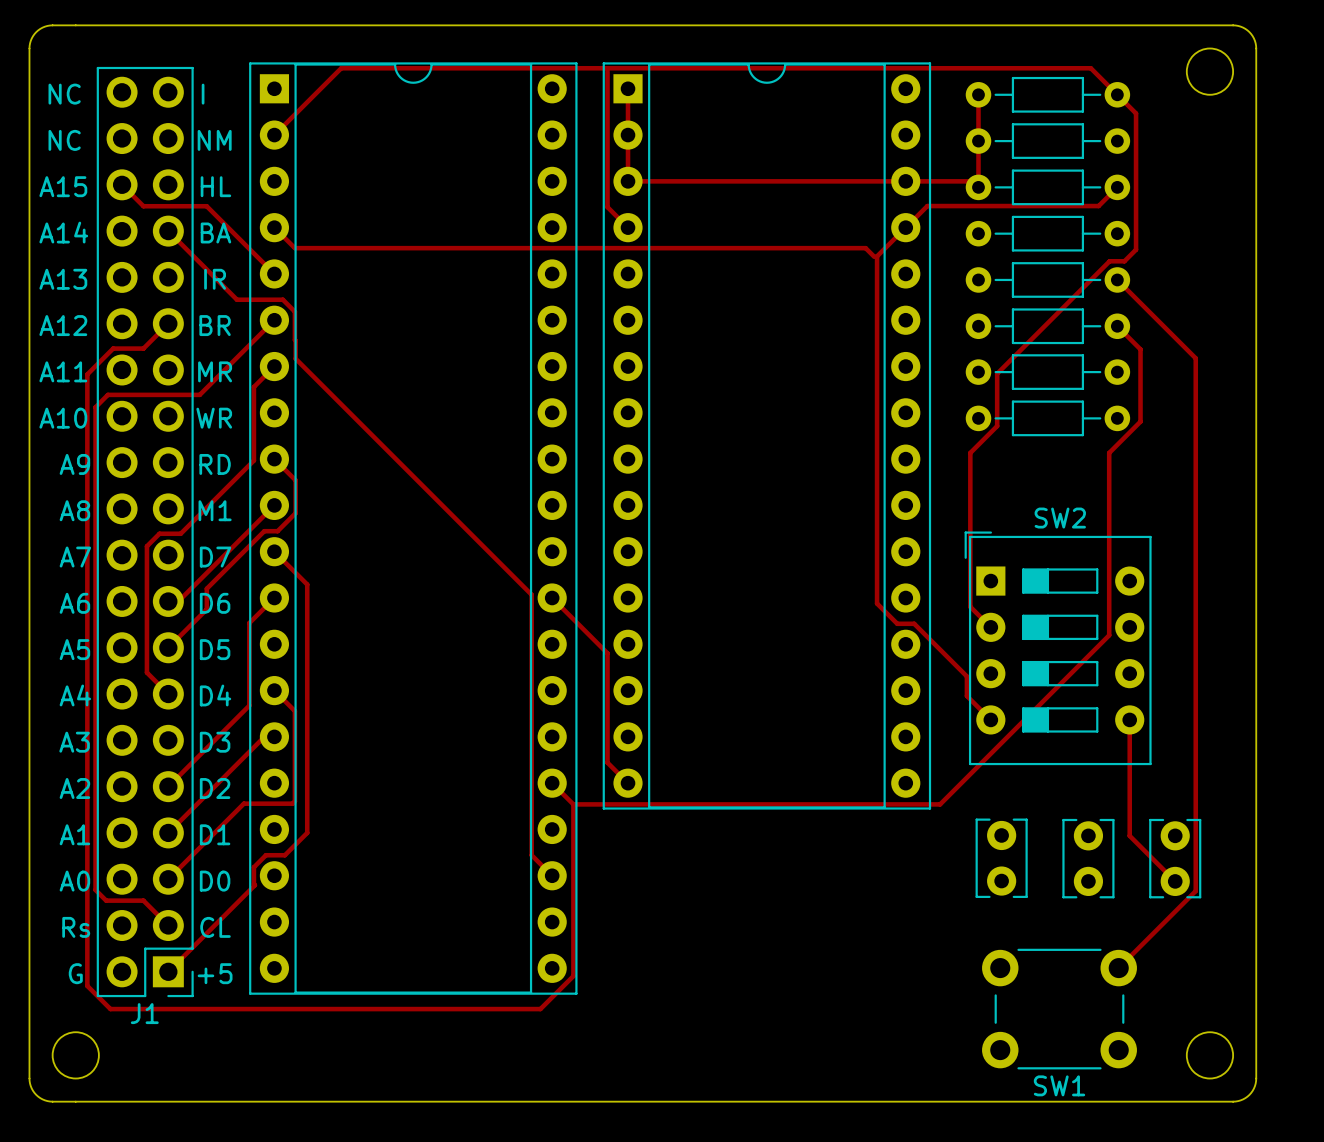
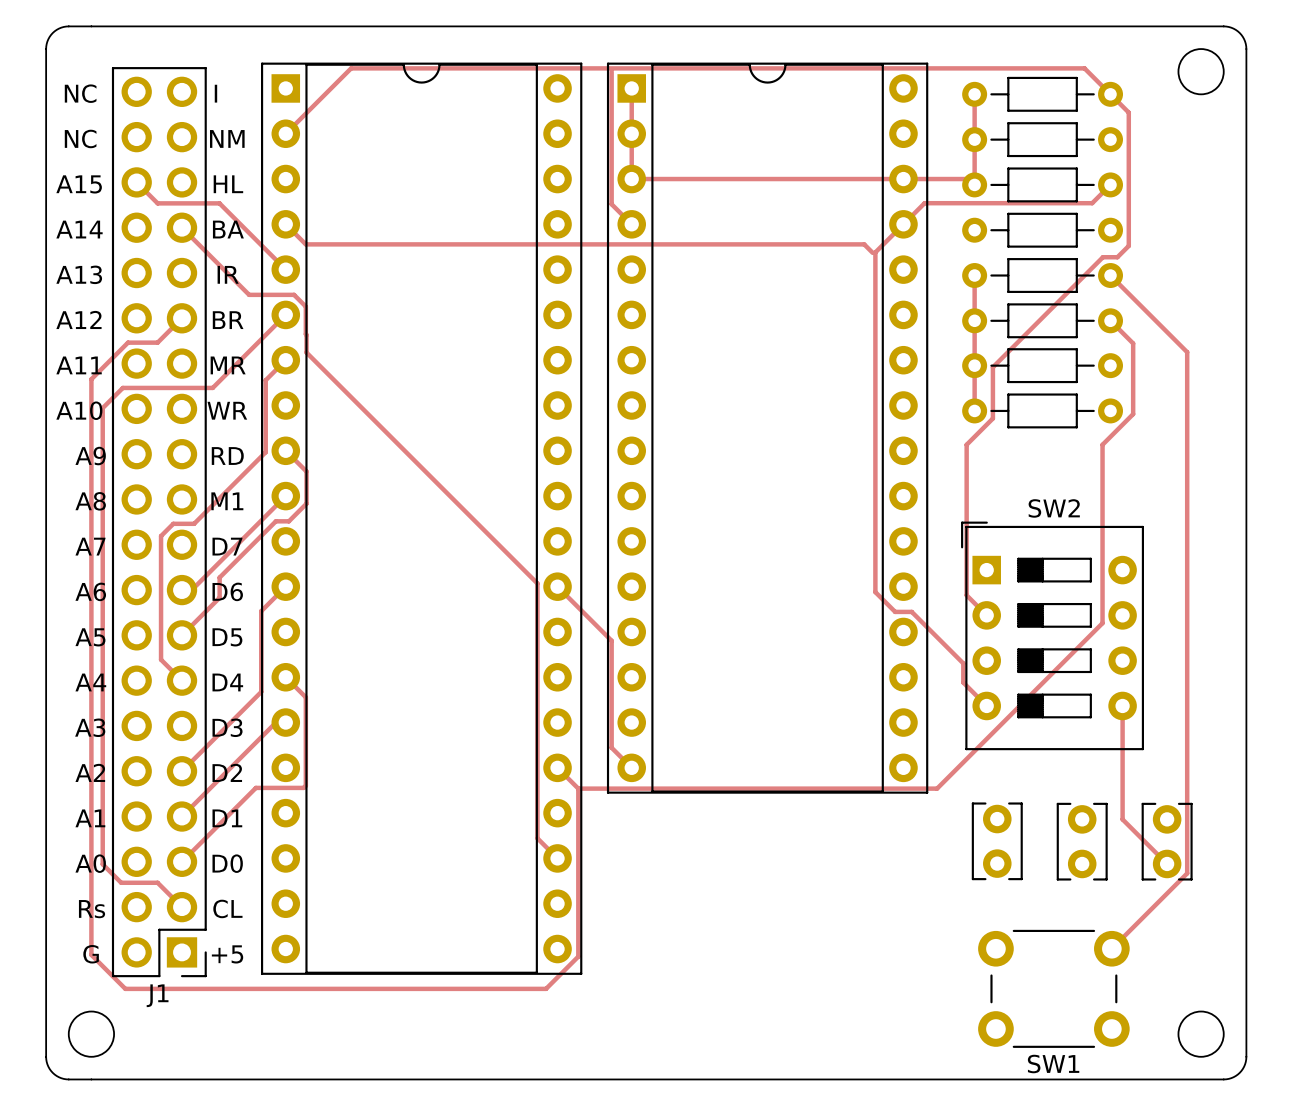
track: none -> (974, 275) (974, 410)
track: (87, 374) (87, 415) -> (110, 400) (102, 408)
track: none -> (102, 367) (91, 379) (91, 954) (102, 966)
track: (95, 407) (95, 889) -> none
track: (274, 551) (307, 584) (307, 832) (284, 855) (265, 855) (253, 867) (254, 885) (168, 971) -> none
track: (87, 881) (87, 985) -> (102, 864) (110, 872)

